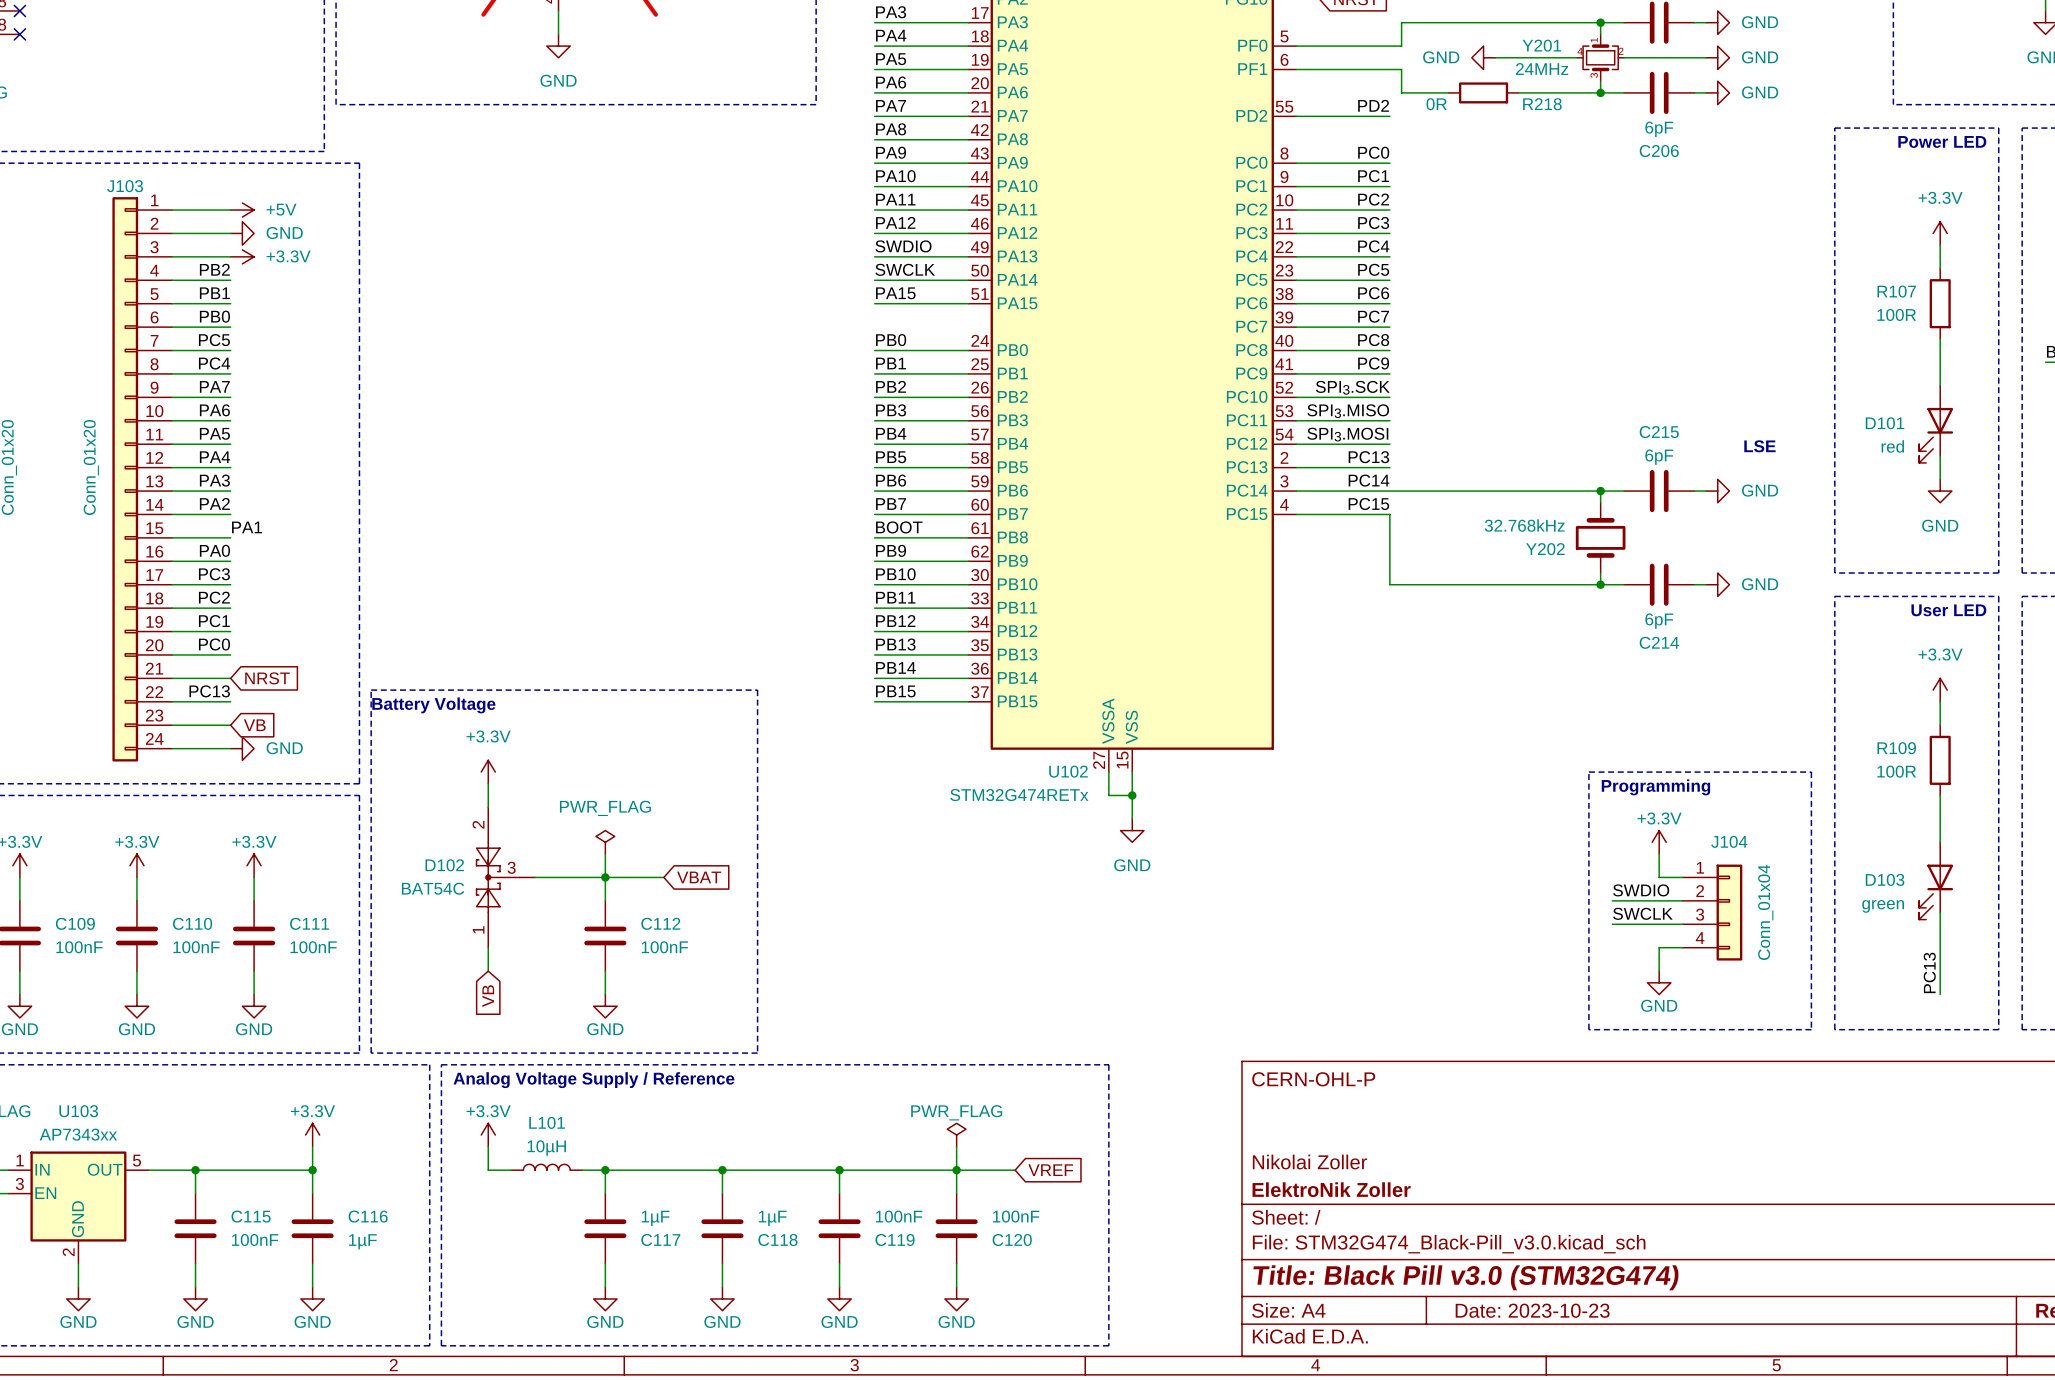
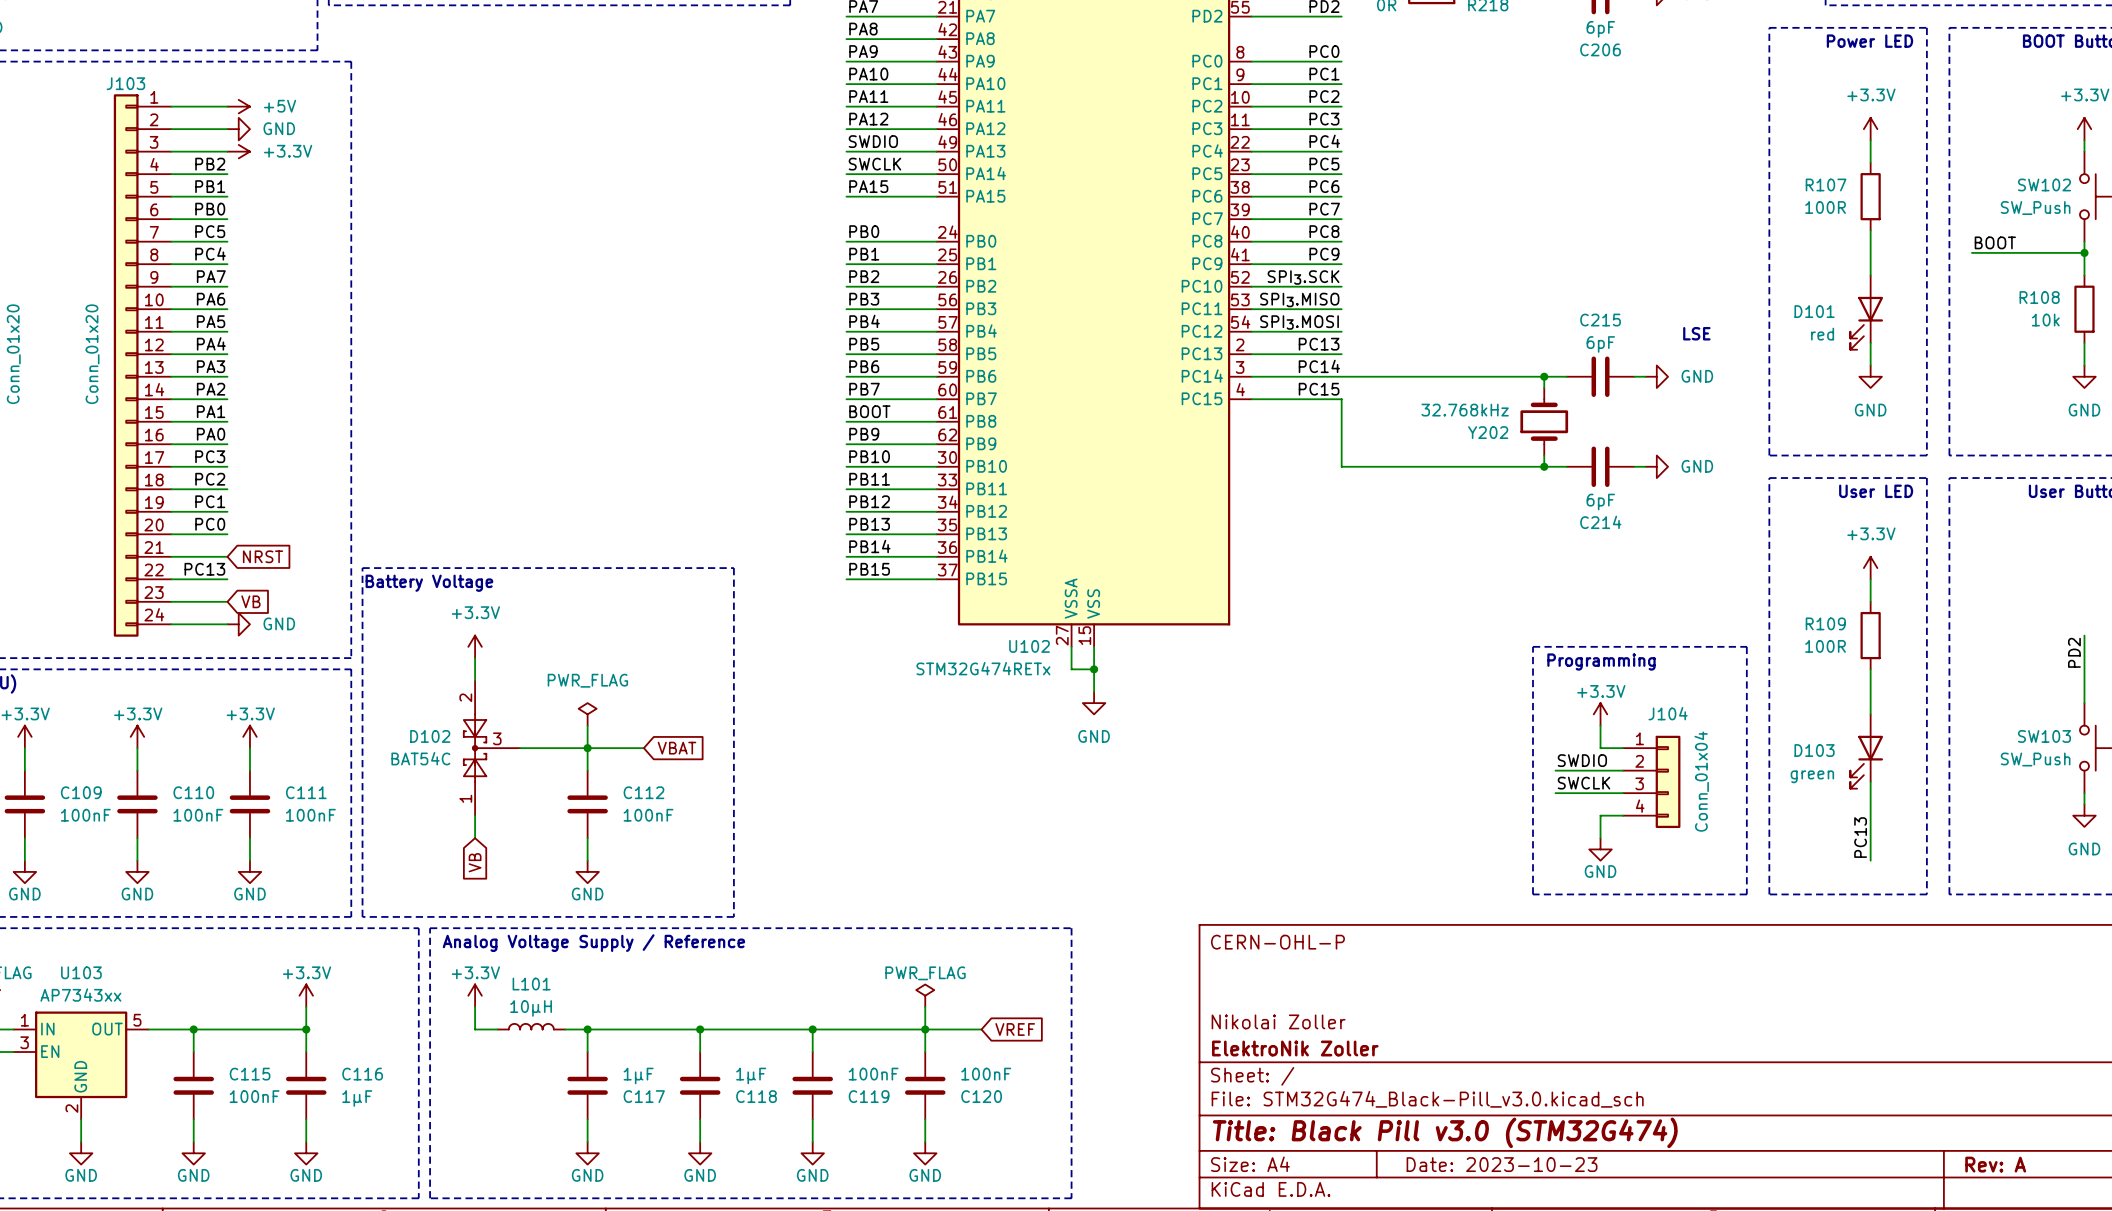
label position: PA1 (247, 527) -> PA1 (211, 411)

